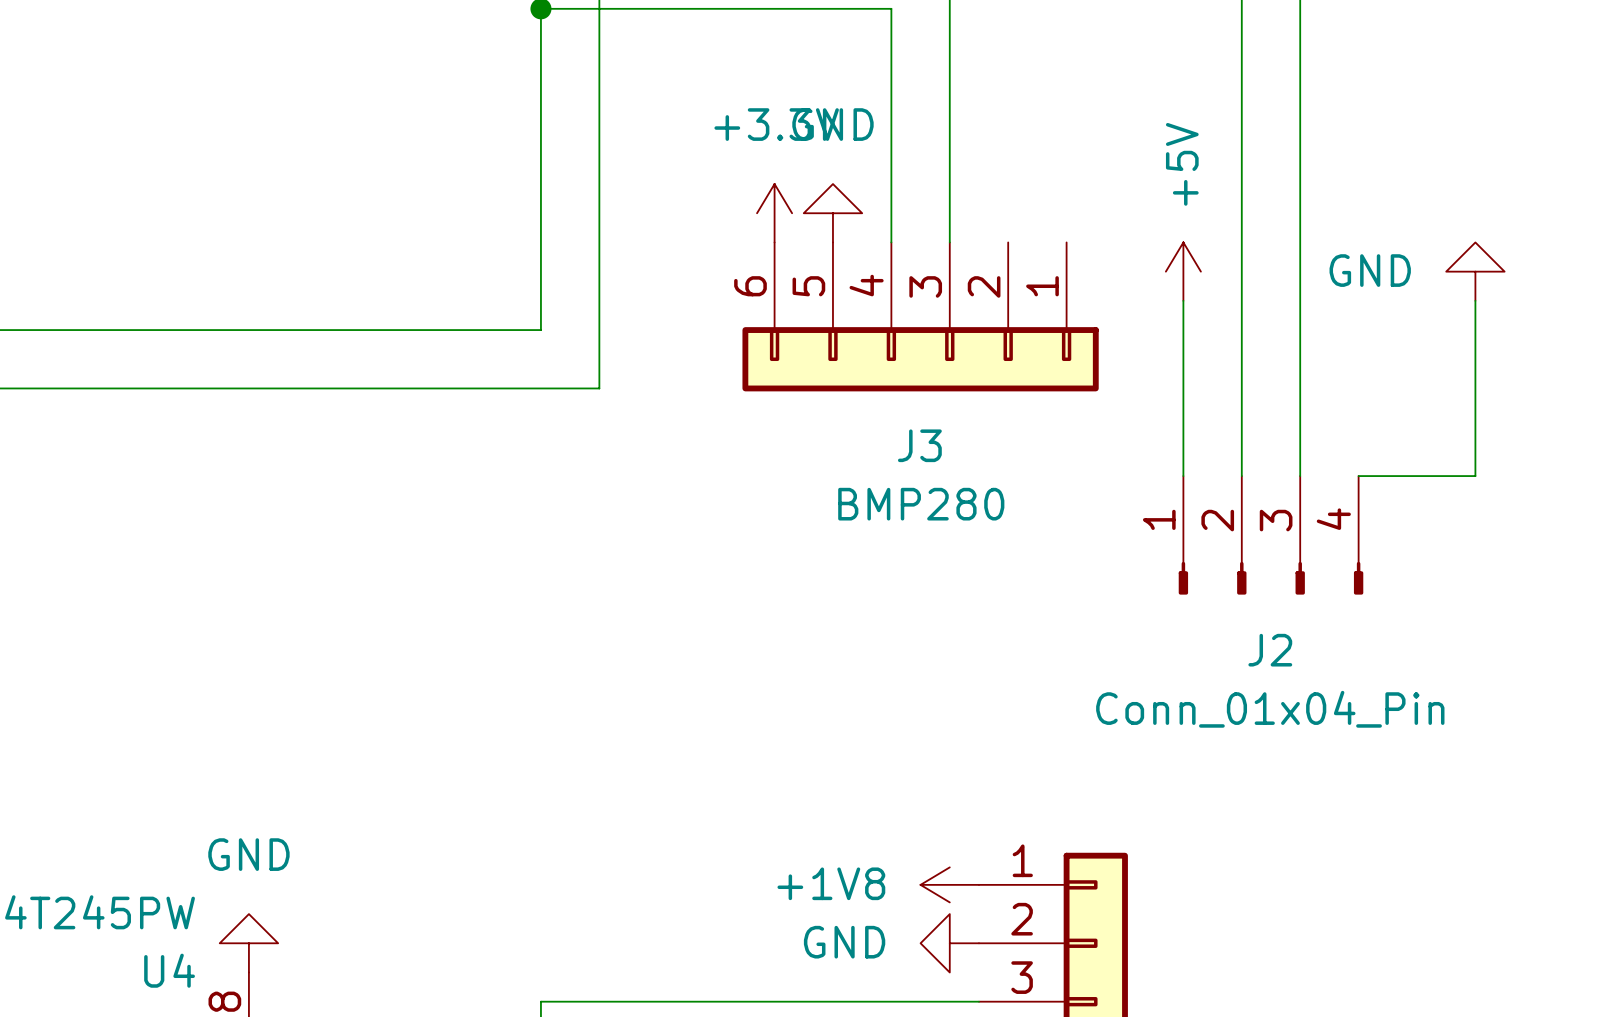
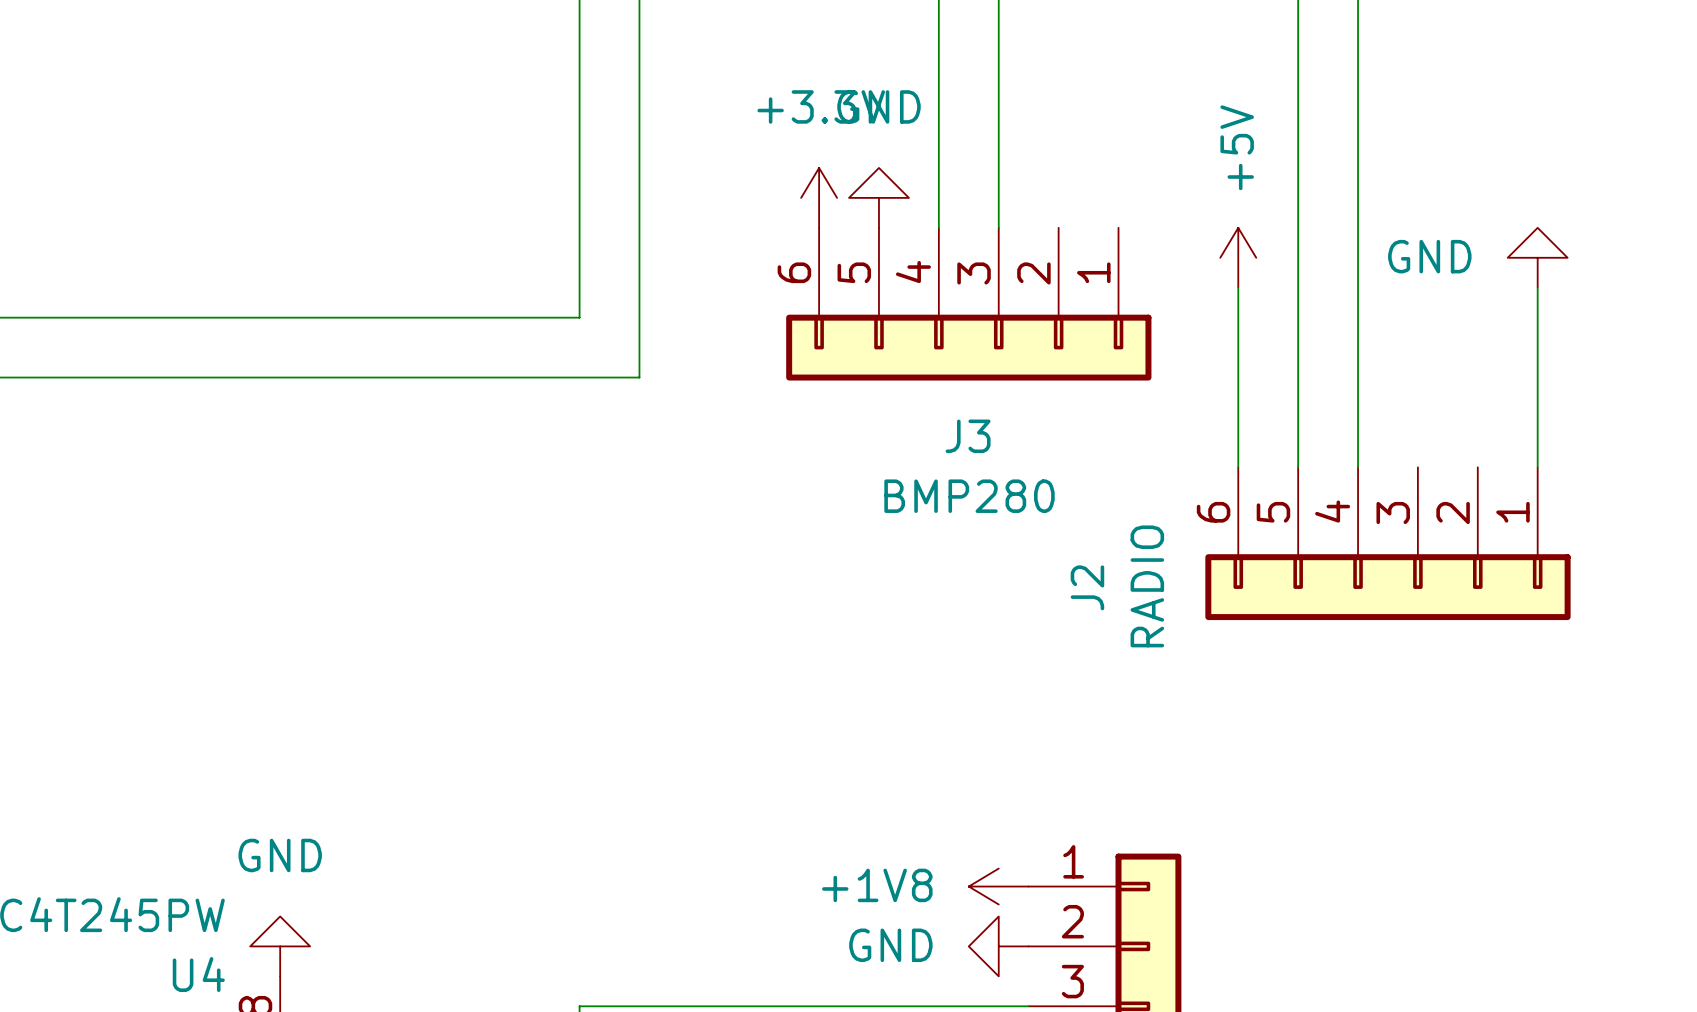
J2 symbol: [1178, 476, 1364, 595] -> [1205, 467, 1571, 621]
wire: (1358, 476) (1475, 476) -> none
J2 name position: J2 (1270, 650) -> J2 (1087, 587)
J2 value: Conn_01x04_Pin (1270, 709) -> RADIO (1147, 586)

